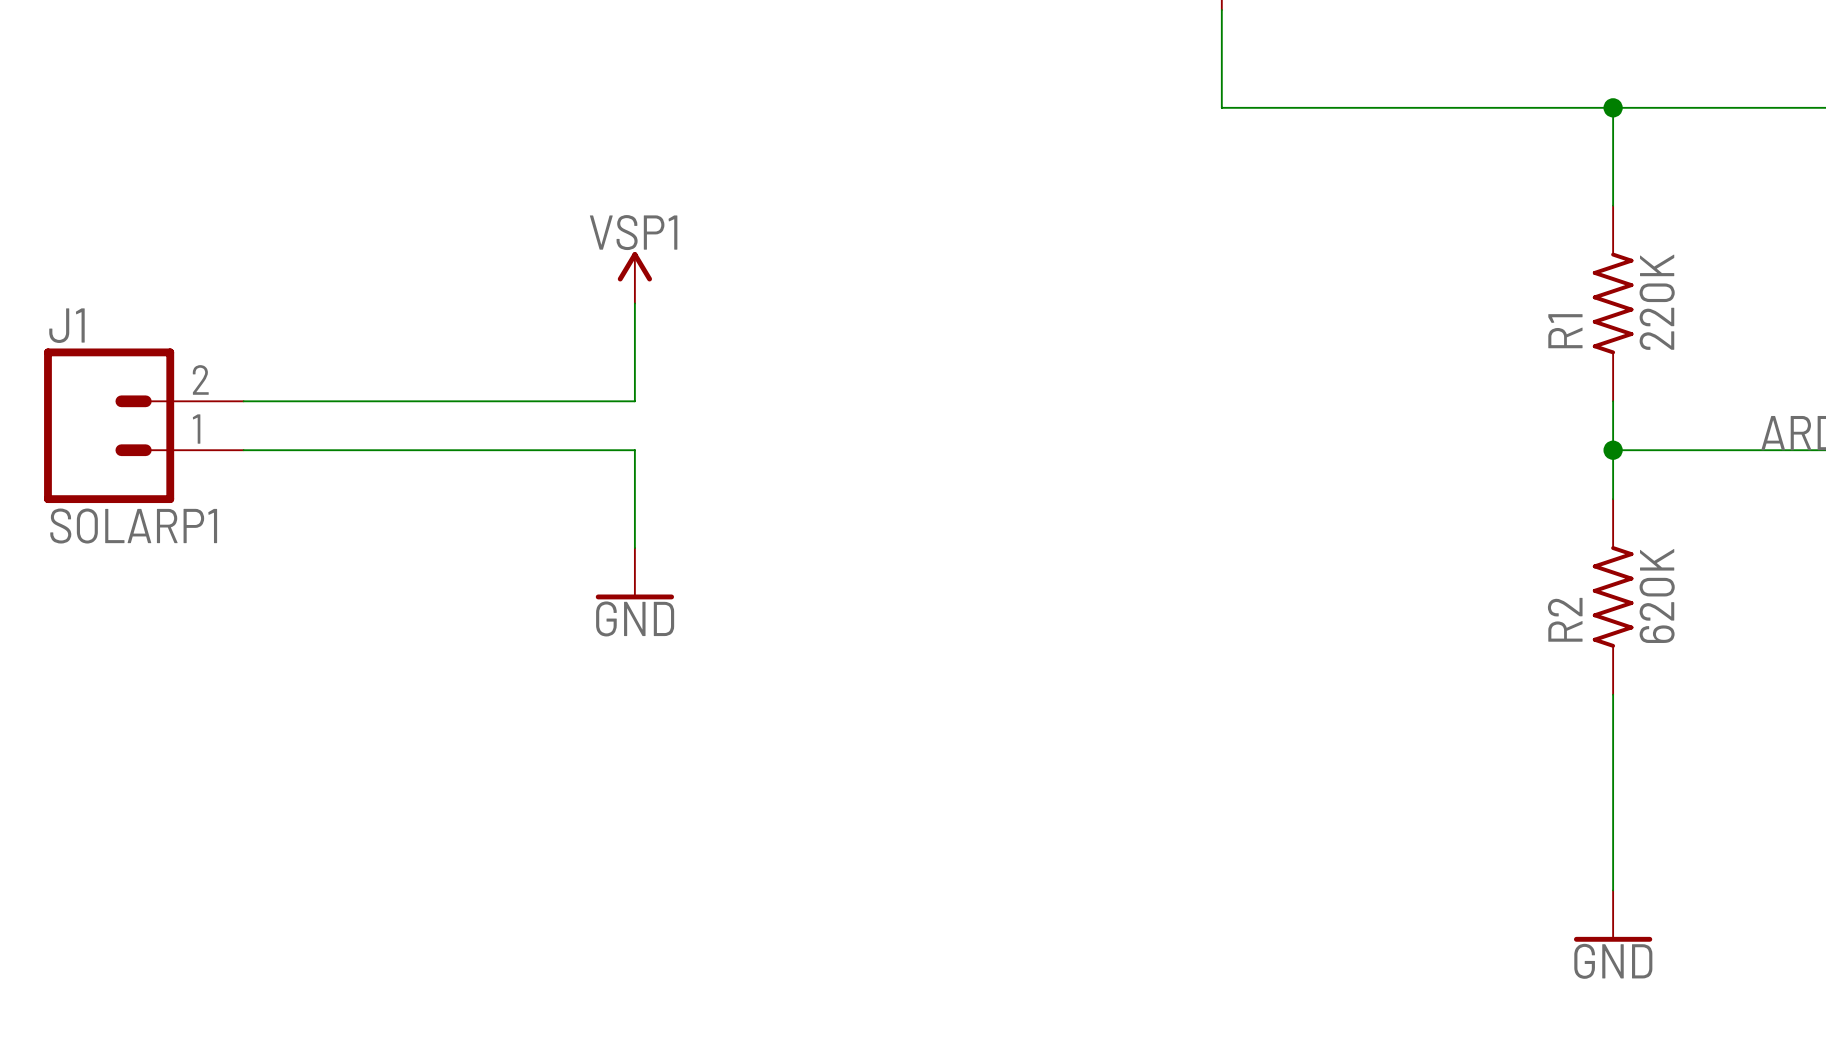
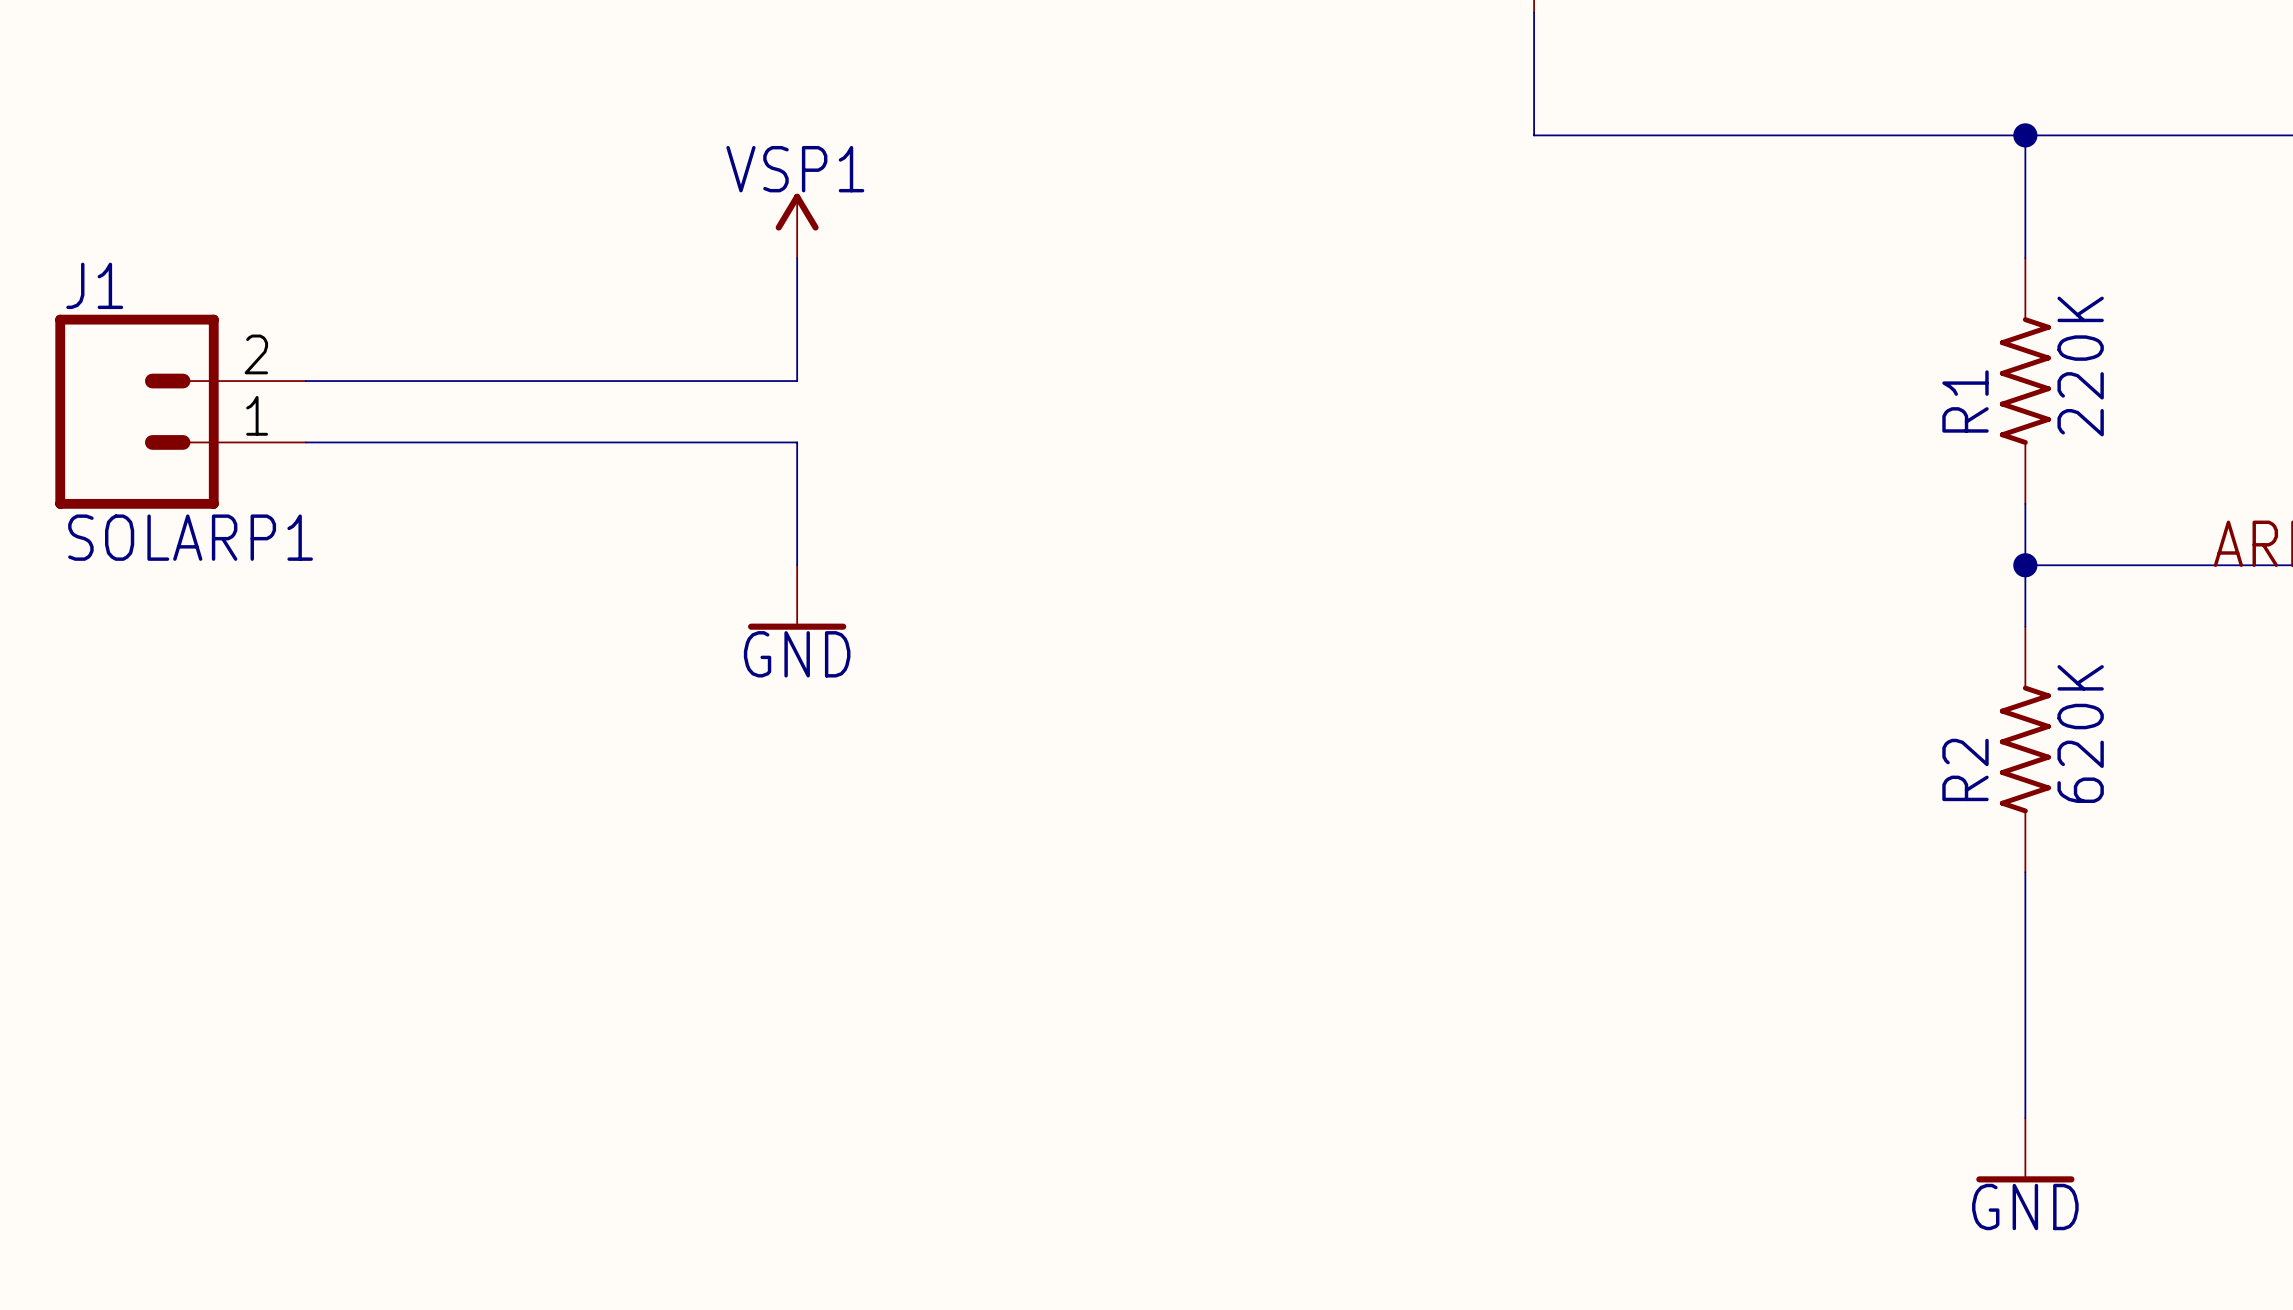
wire: none -> (797, 258) (797, 381) (305, 381)
power symbol position: VSP1 (634, 277) -> VSP1 (797, 225)
wire: (634, 303) (634, 352) -> (305, 442) (797, 442)
wire: (243, 401) (634, 401) -> (797, 565) (797, 503)
J1 position: (143, 425) -> (180, 411)
wire: (243, 450) (634, 450) (634, 548) -> none
power symbol position: GND (634, 573) -> GND (797, 597)

